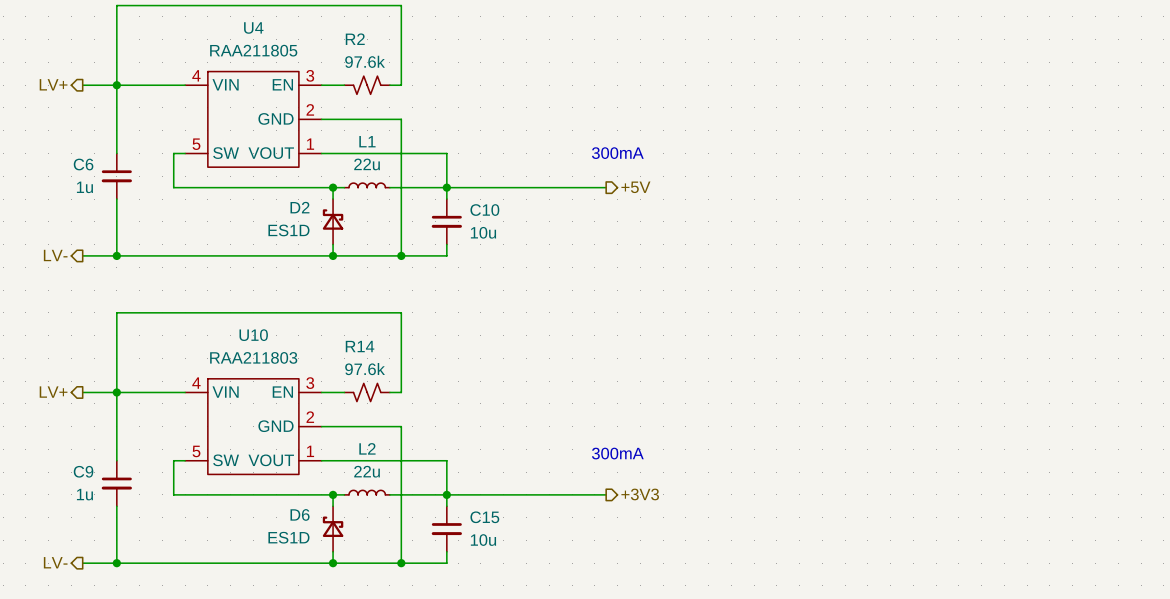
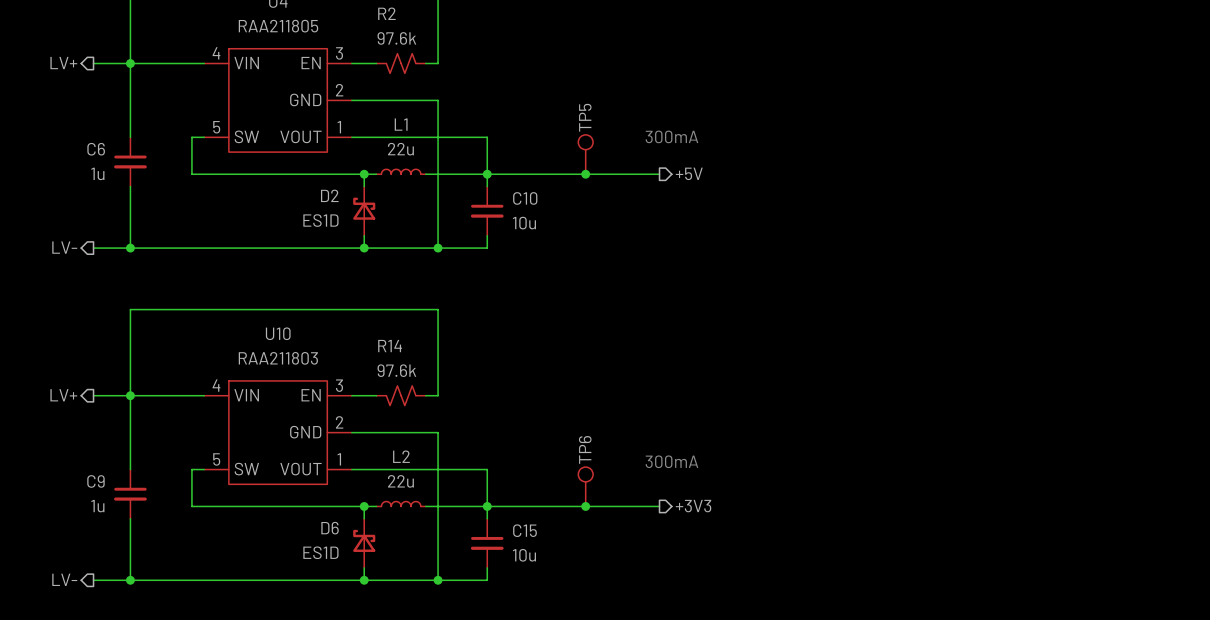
TP5: none -> (585, 154)
junction: none -> (585, 174)
TP6: none -> (585, 486)
junction: none -> (585, 506)

